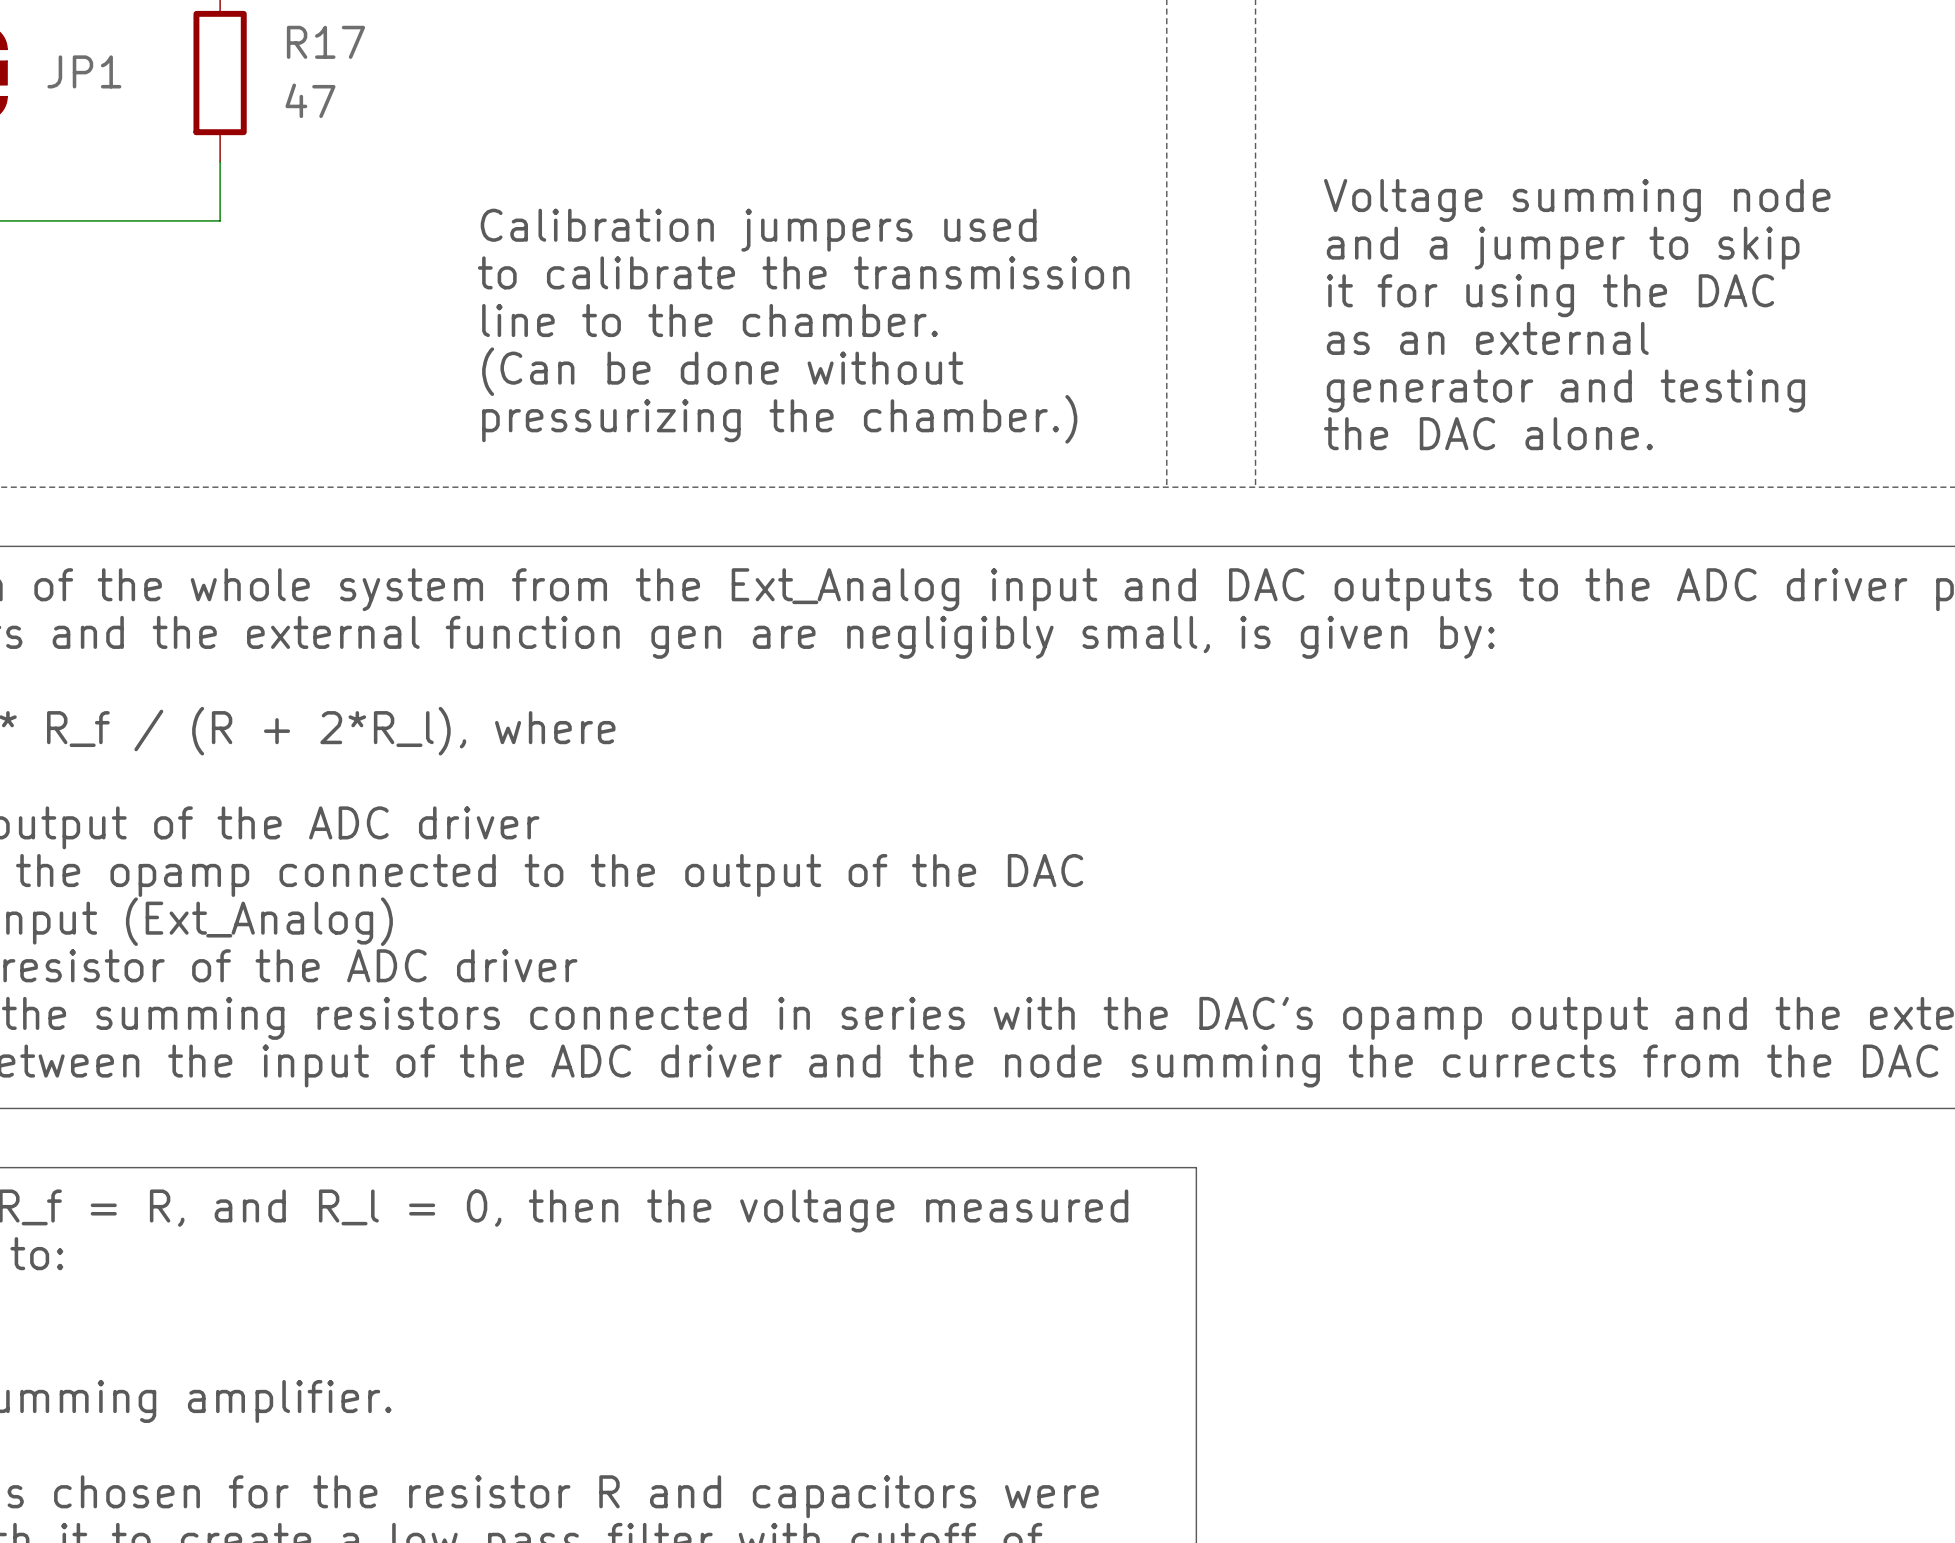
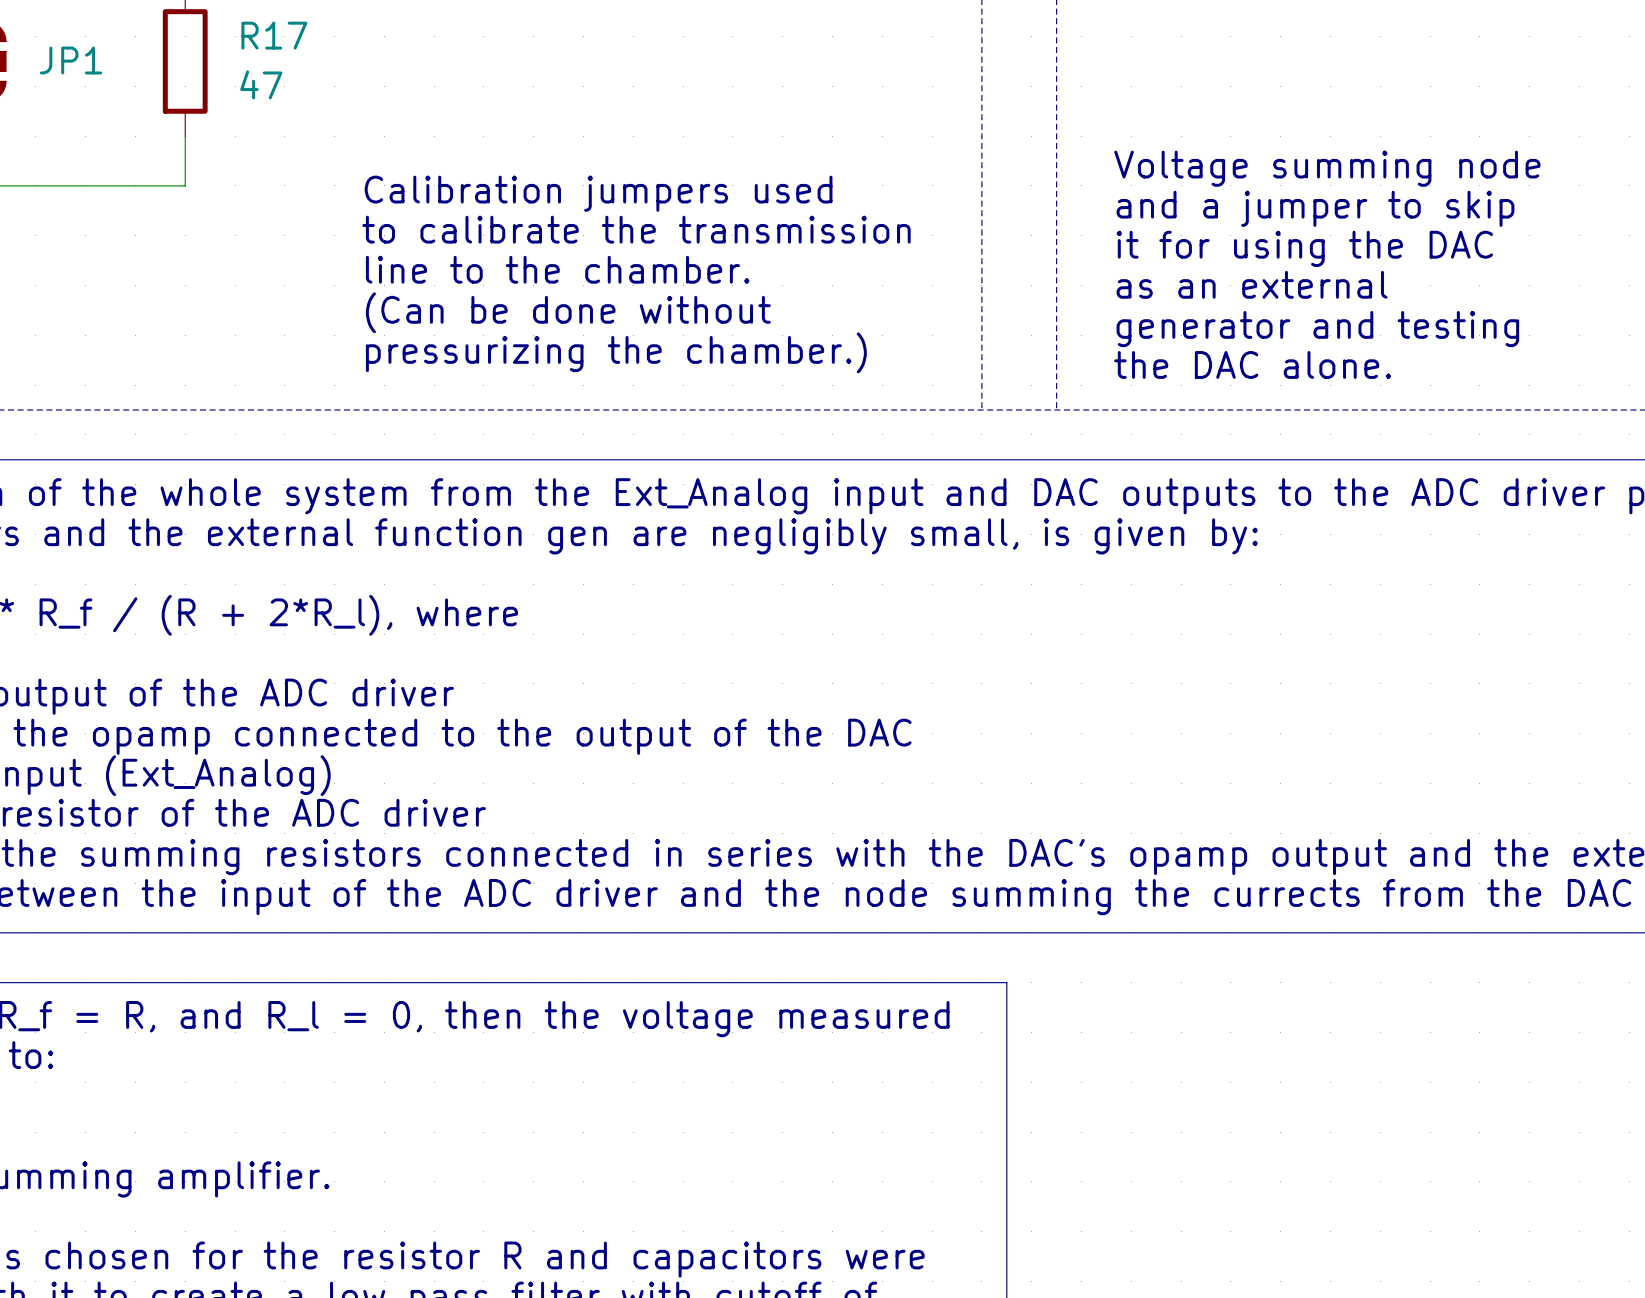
text position: Calibration jumpers used (758, 230) -> Calibration jumpers used (598, 193)
text position: to calibrate the transmission (803, 272) -> to calibrate the transmission (636, 229)
text position: line to the chamber. (710, 320) -> line to the chamber. (557, 269)
text position: (Can be done without (722, 371) -> (Can be done without (568, 312)
text position: pressurizing the chamber.) (779, 419) -> pressurizing the chamber.) (616, 352)

